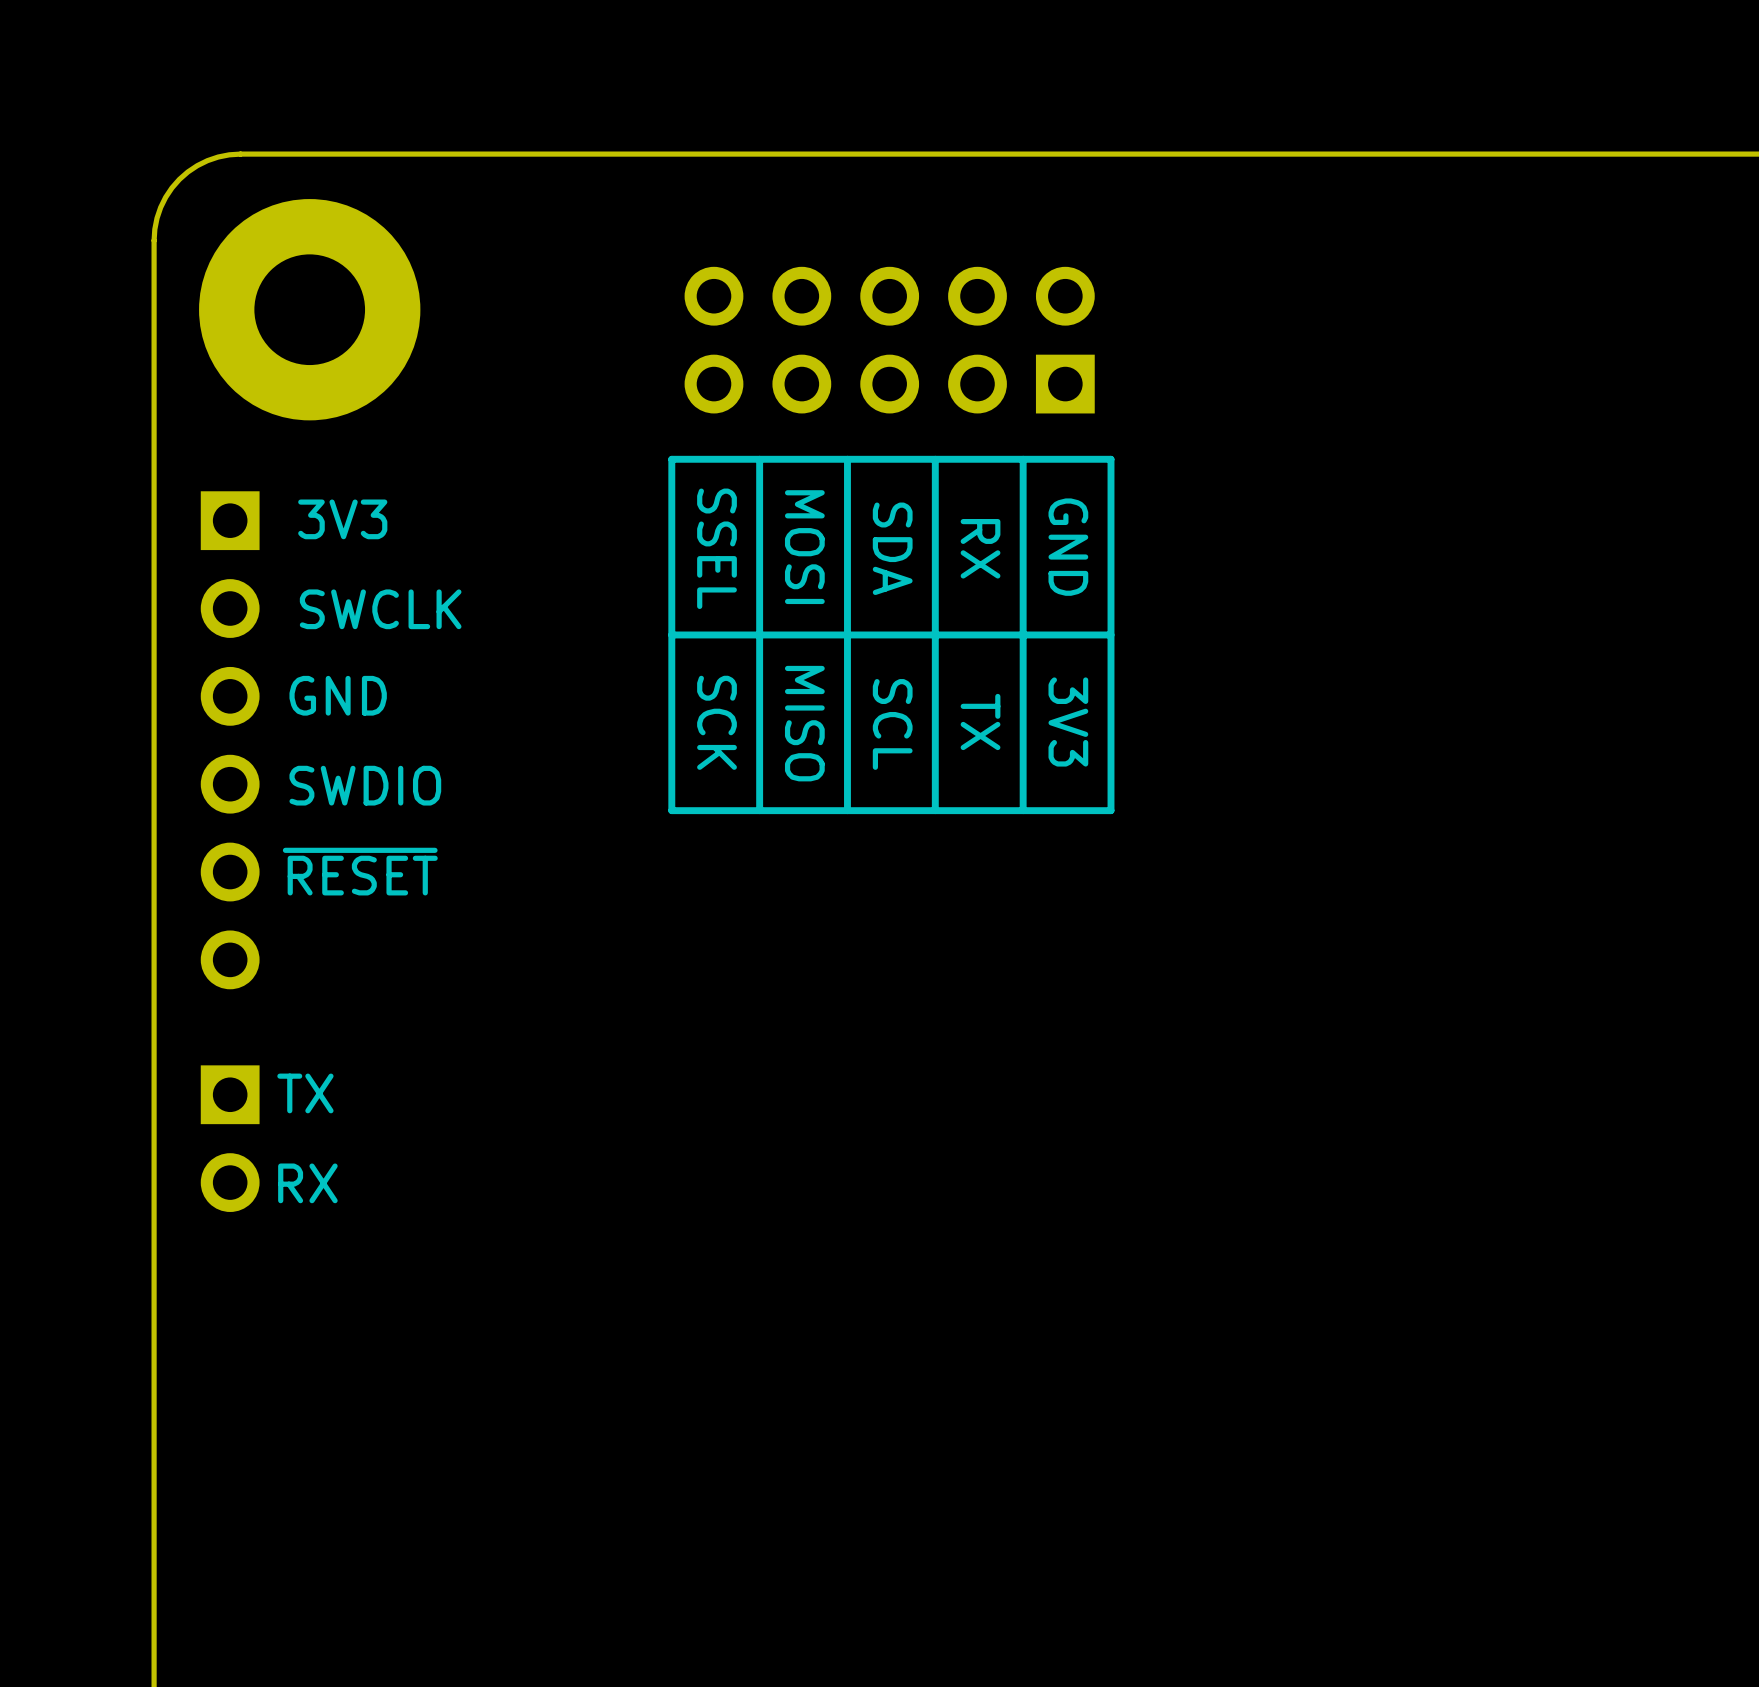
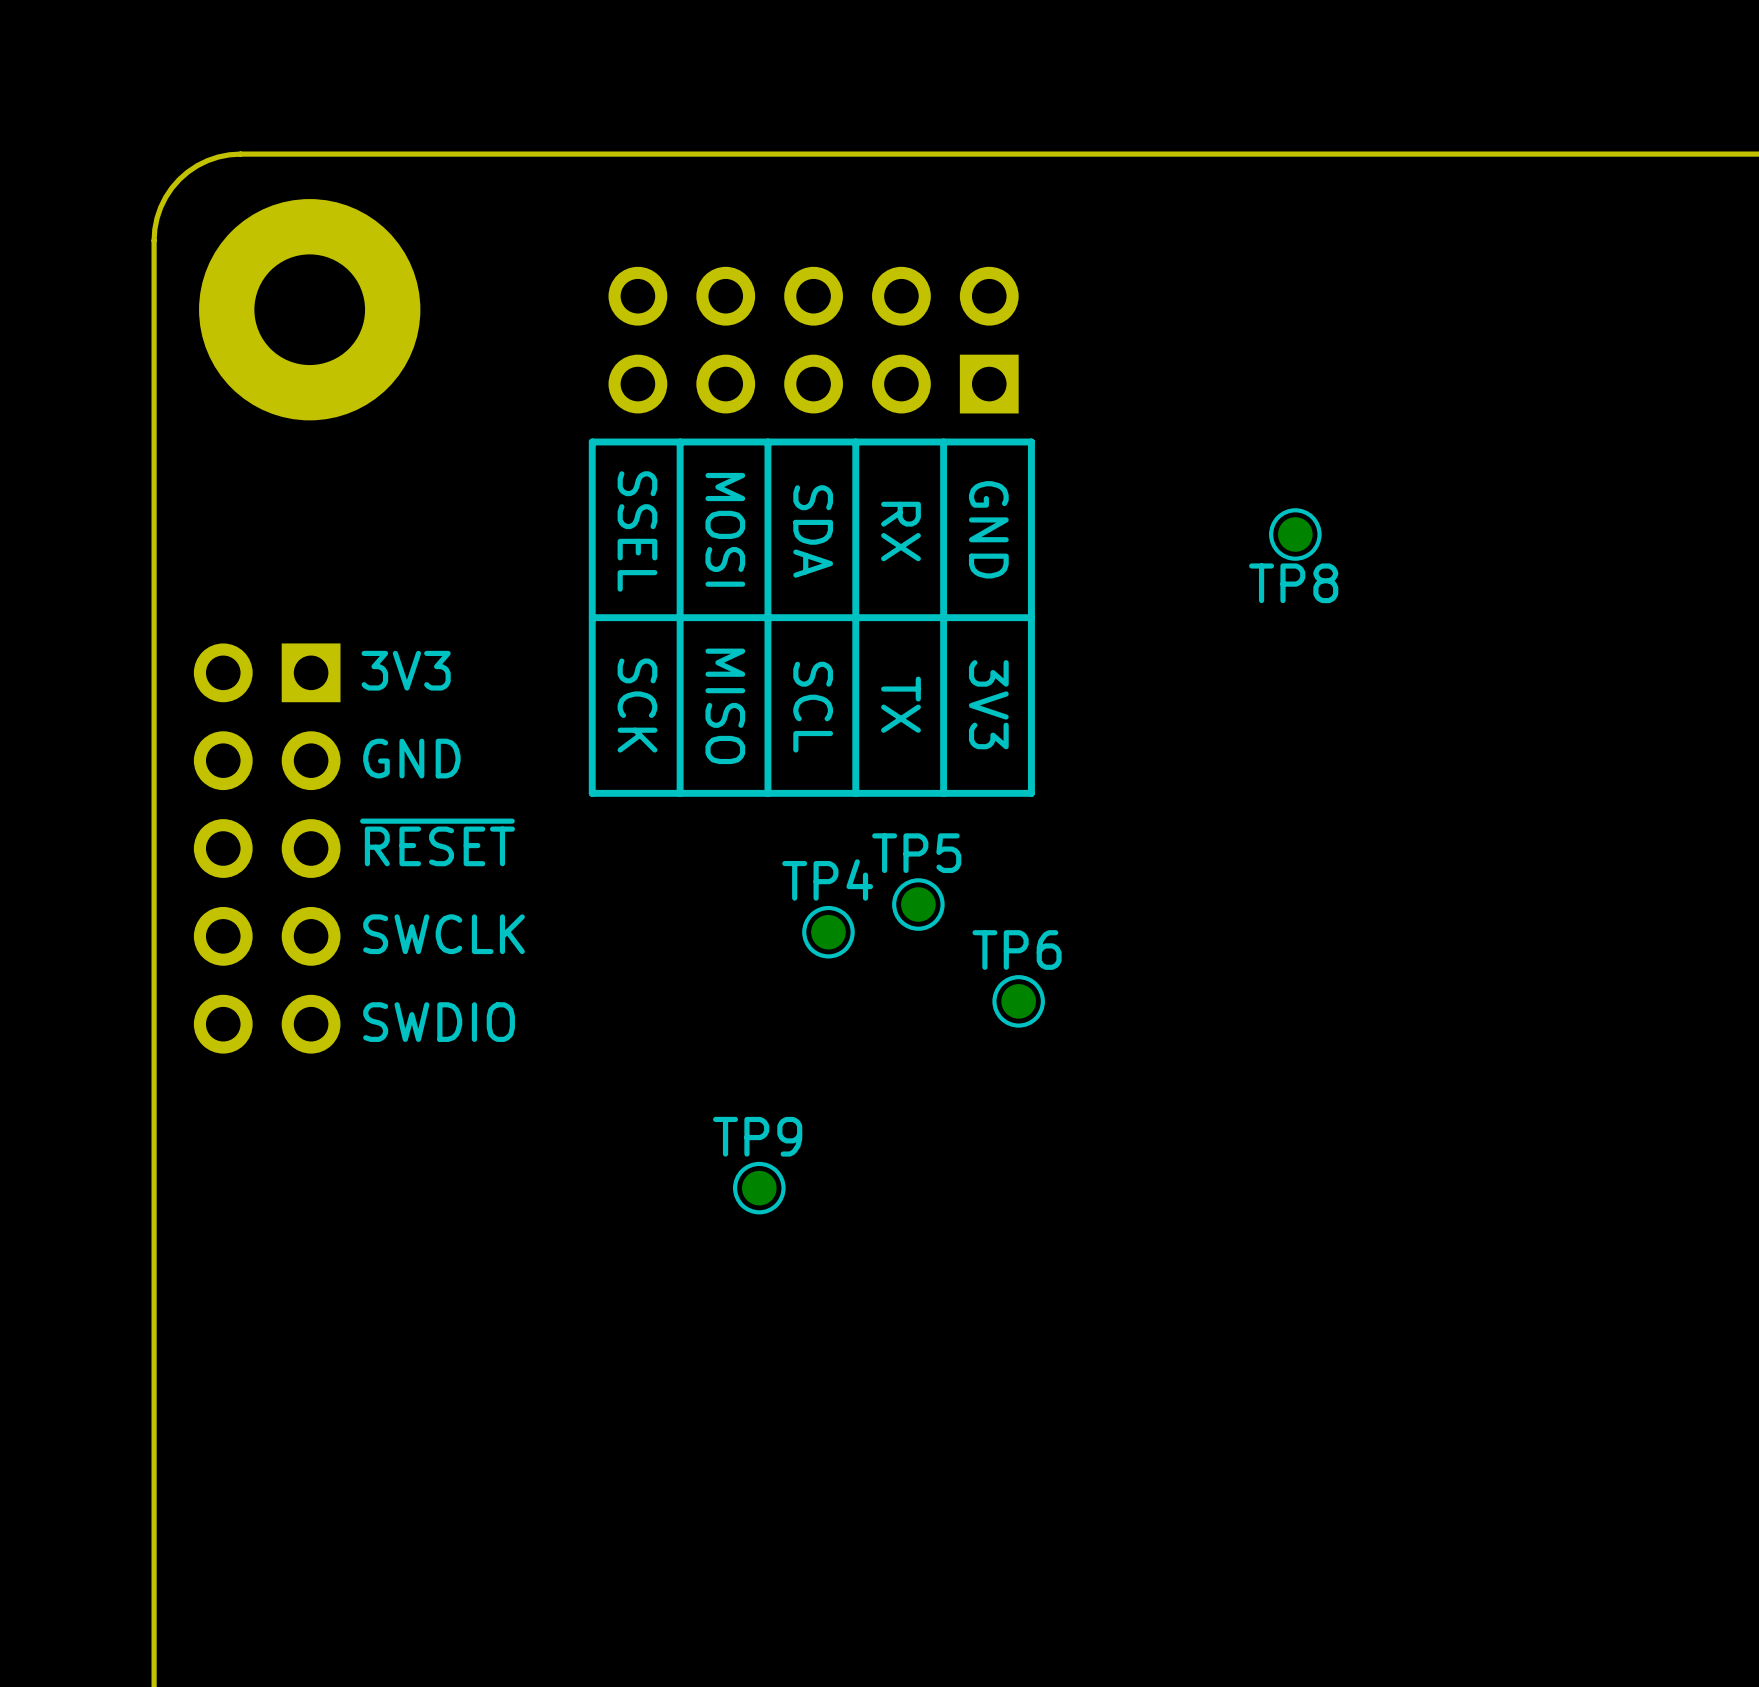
part position: (889, 340) -> (813, 340)
line: (759, 459) (759, 810) -> (680, 441) (680, 793)
line: (847, 459) (847, 810) -> (767, 441) (767, 793)
line: (935, 459) (935, 810) -> (855, 441) (855, 793)
line: (1023, 459) (1023, 810) -> (943, 441) (943, 793)
line: (1111, 459) (1111, 810) (671, 810) (671, 459) (1111, 459) -> (1031, 441) (1031, 793) (592, 793) (592, 441) (1031, 441)
text position: 3V3 (342, 519) -> 3V3 (406, 670)
TP8: none -> (1295, 534)
text position: MOSI (804, 547) -> MOSI (725, 529)
text position: GND (1068, 547) -> GND (988, 529)
text position: SSEL (717, 548) -> SSEL (637, 531)
text position: SDA (892, 548) -> SDA (813, 531)
text position: RX (980, 548) -> RX (900, 531)
text position: SWCLK (380, 609) -> SWCLK (444, 934)
line: (1111, 634) (671, 634) -> (1031, 617) (592, 617)
text position: GND (338, 695) -> GND (411, 758)
text position: TX (980, 721) -> TX (900, 704)
text position: 3V3 (1068, 721) -> 3V3 (988, 704)
text position: SCK (717, 722) -> SCK (637, 705)
text position: MISO (804, 723) -> MISO (725, 706)
text position: SCL (892, 724) -> SCL (813, 707)
part: (230, 740) -> none
text position: SWDIO (365, 785) -> SWDIO (439, 1022)
part: none -> (267, 848)
text position: ~{RESET} (360, 871) -> ~{RESET} (437, 842)
TP5: none -> (918, 904)
TP4: none -> (828, 932)
TP6: none -> (1018, 1001)
text: TX (305, 1093) -> none
part: (230, 1138) -> none
text: RX (307, 1183) -> none
TP9: none -> (759, 1188)

